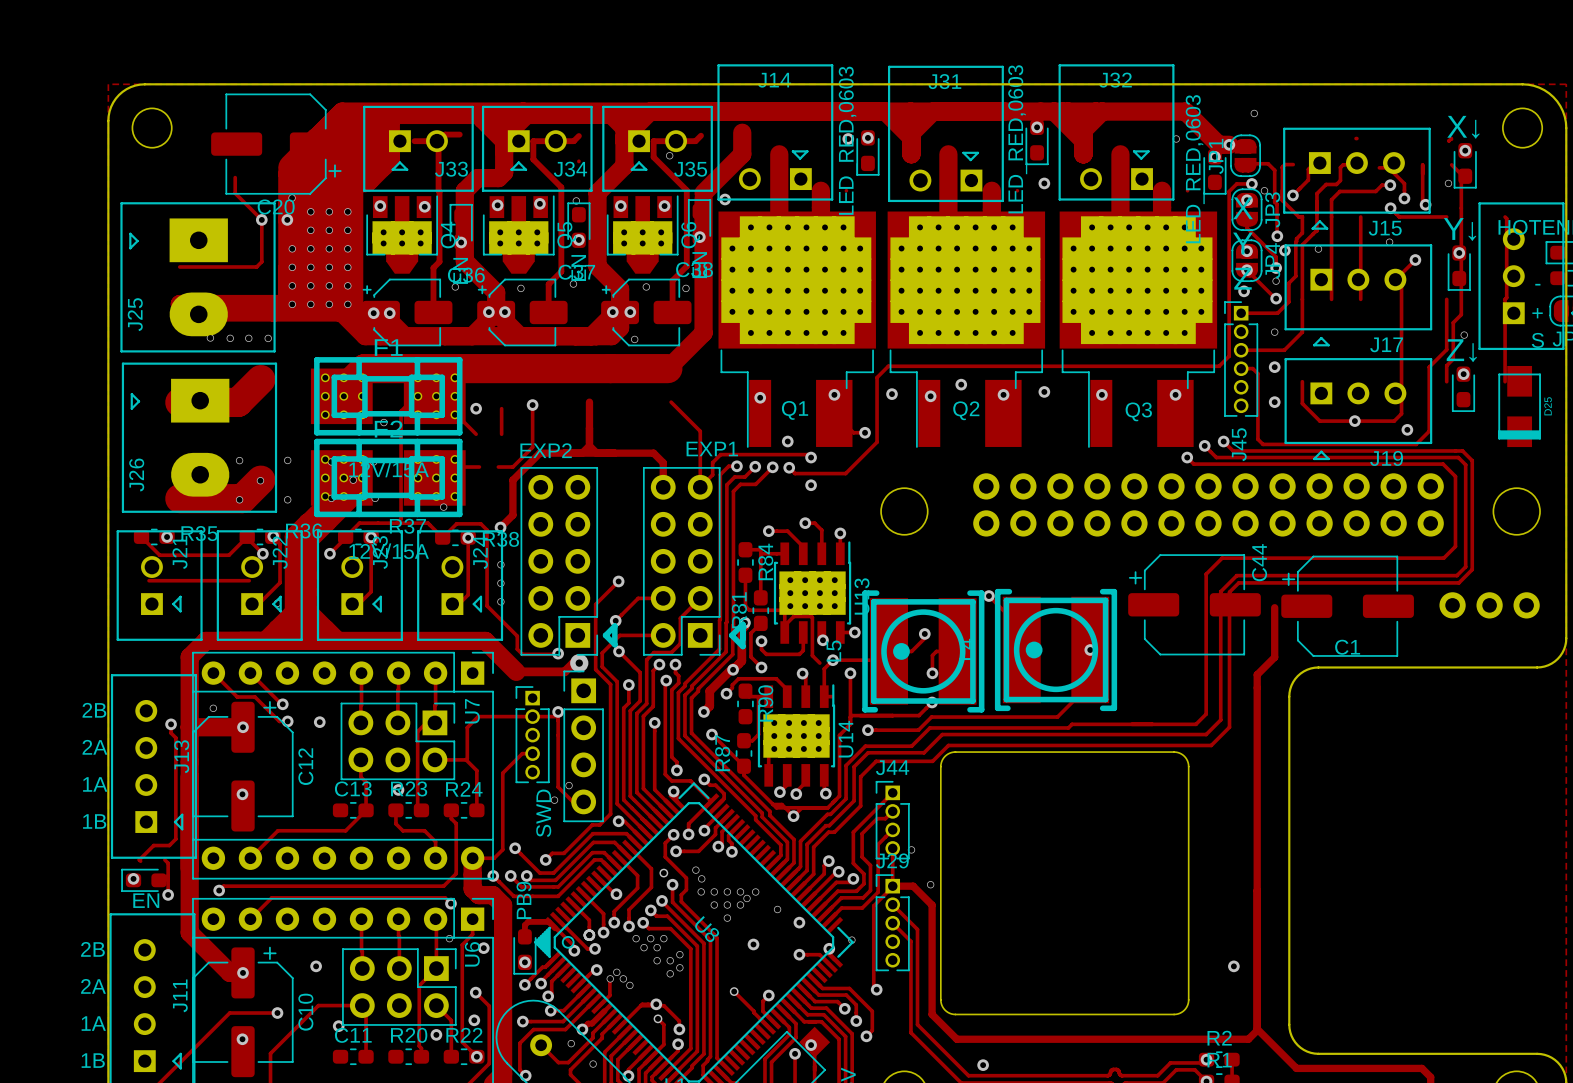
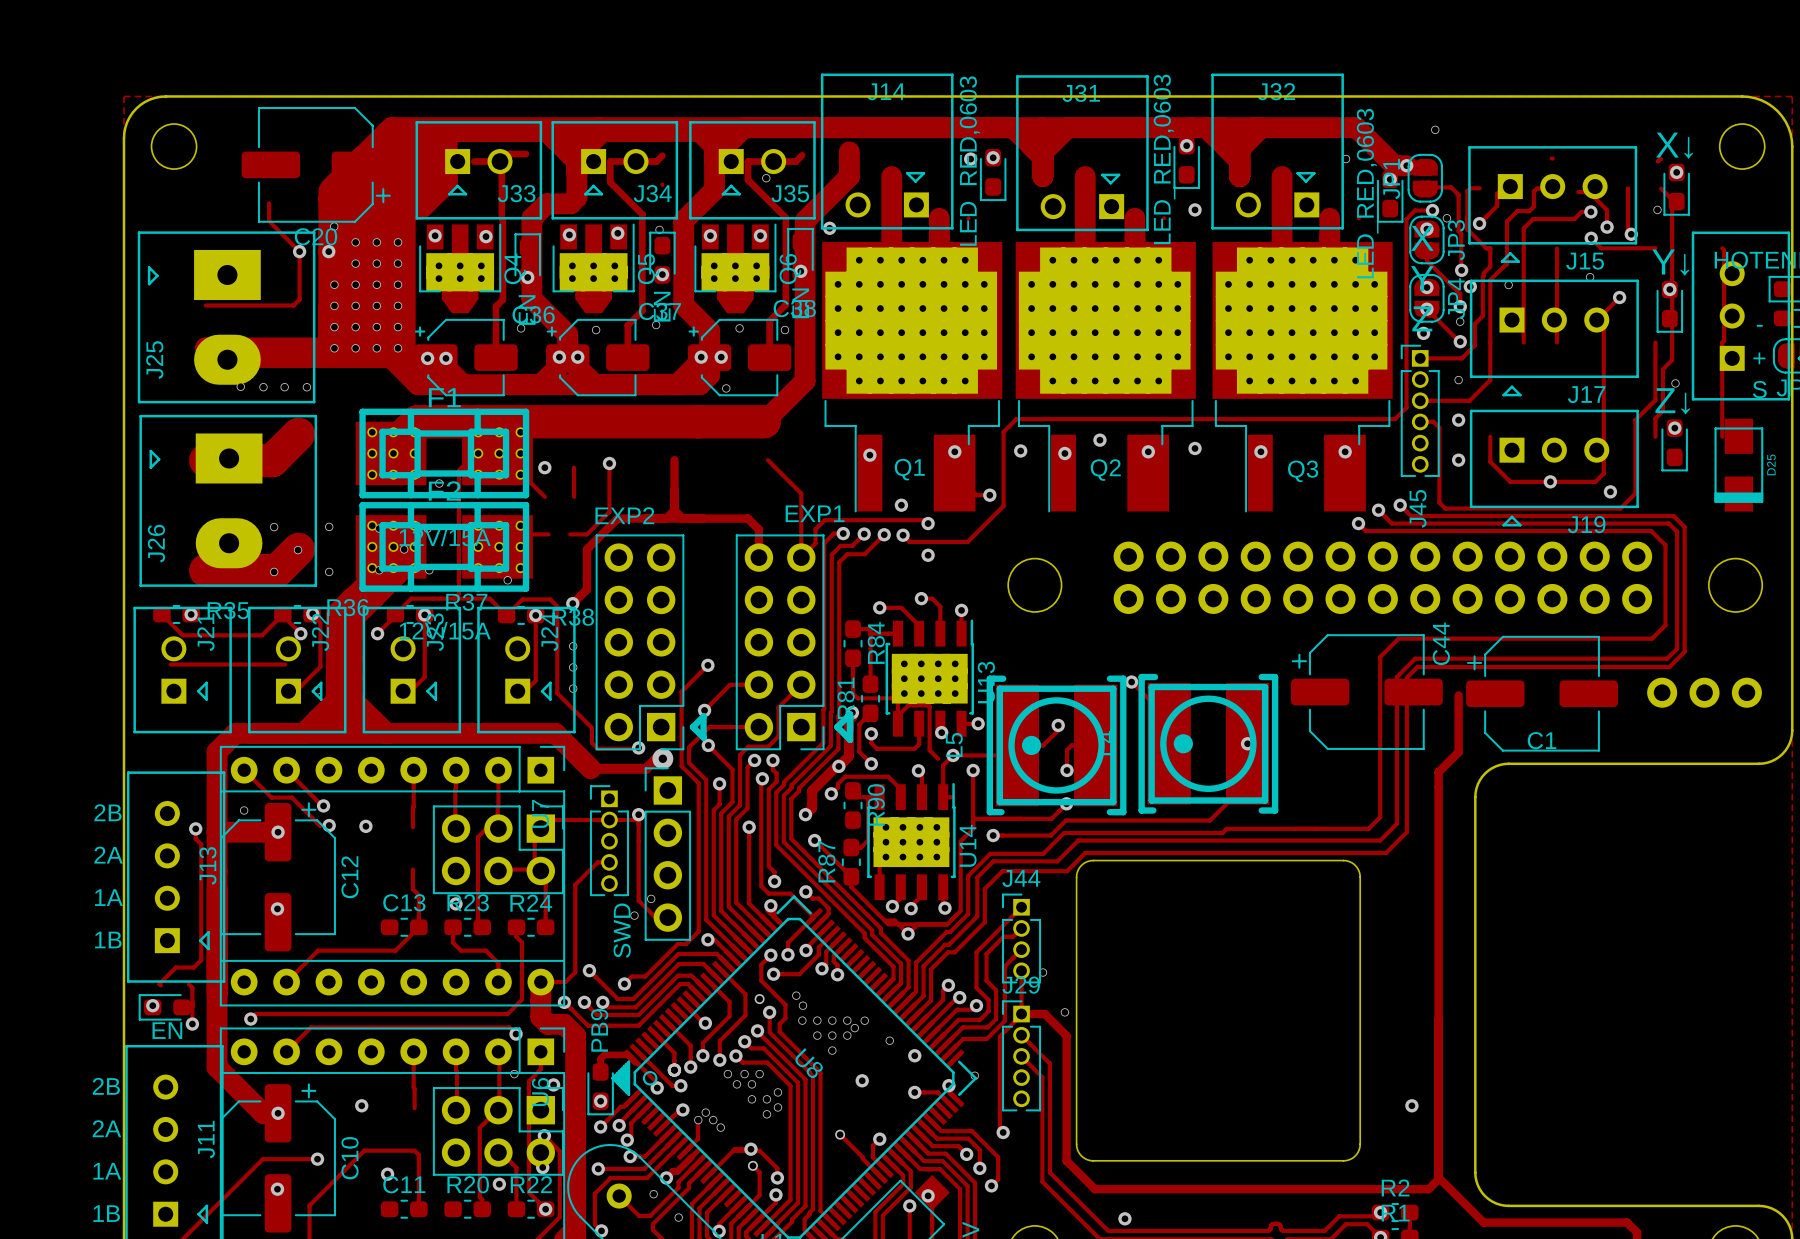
part position: (397, 741) -> (498, 849)
part position: (399, 987) -> (498, 1131)

